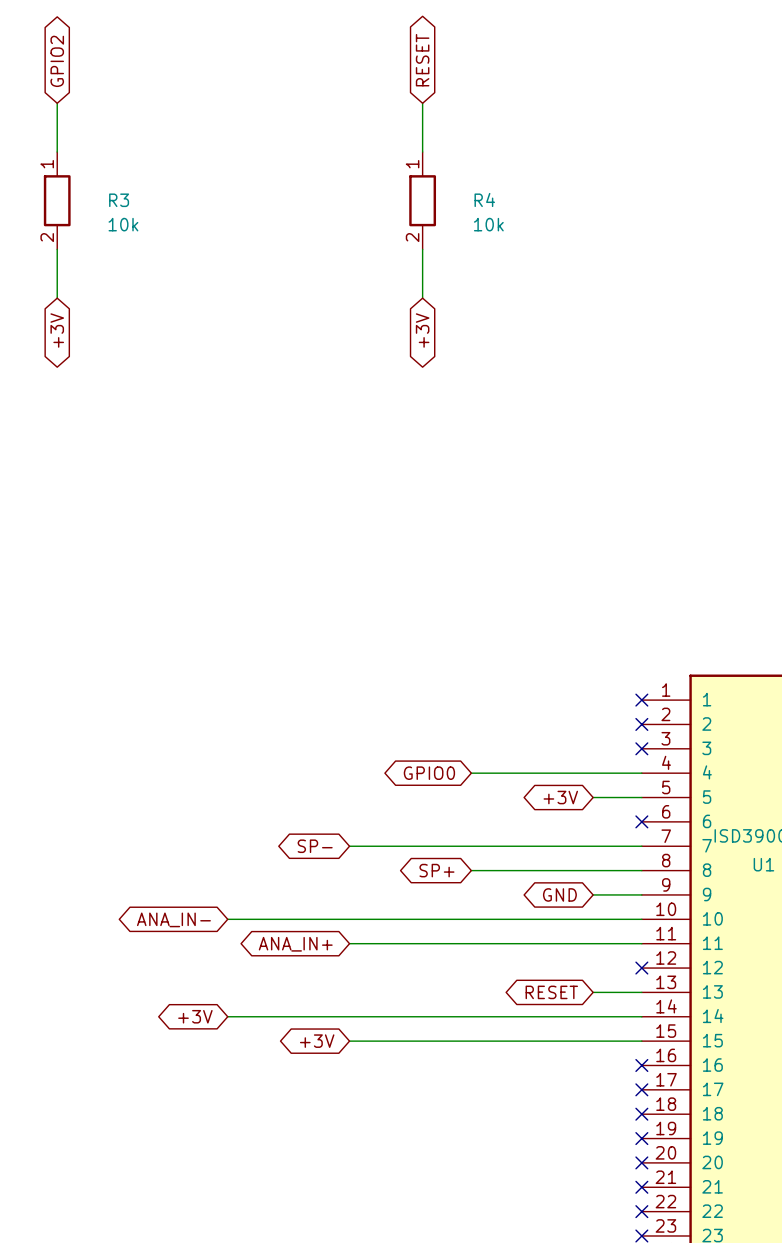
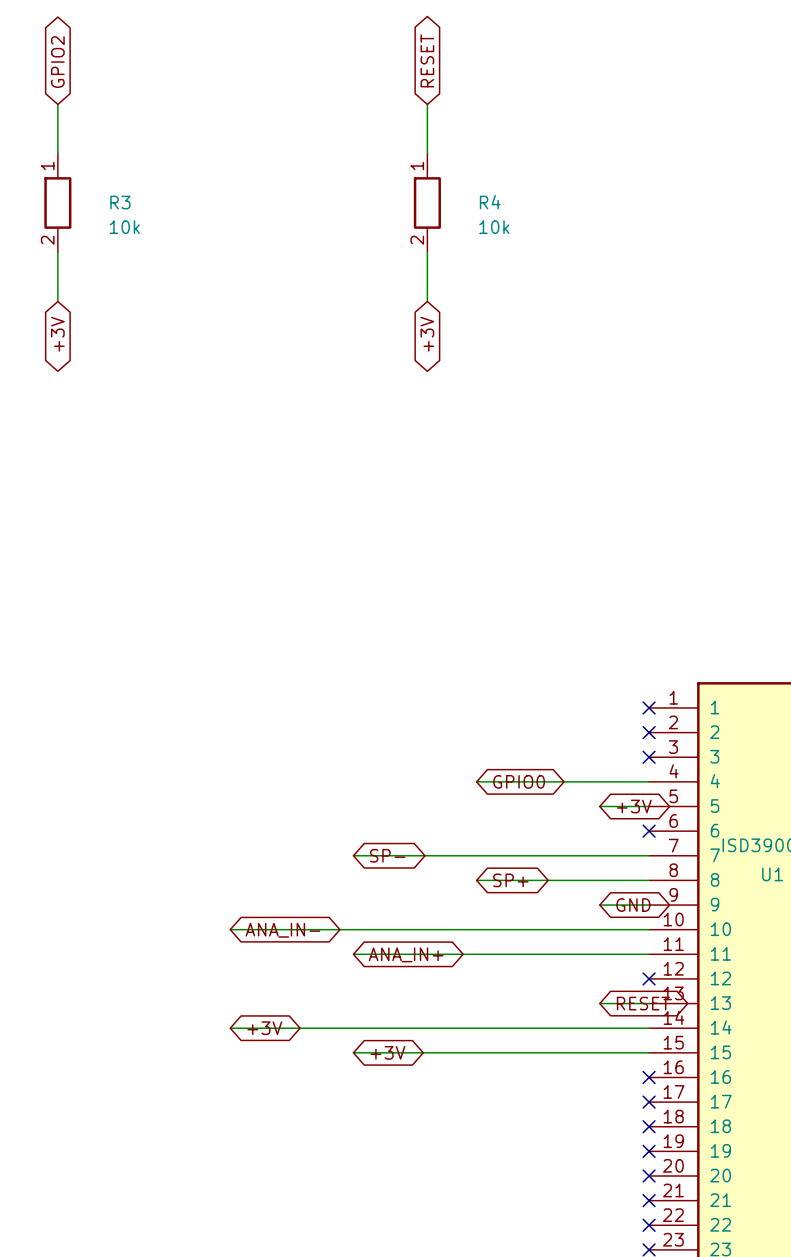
global label rotation: 0° (429, 773) -> 180° (519, 781)
global label rotation: 0° (560, 797) -> 180° (634, 806)
global label rotation: 0° (315, 846) -> 180° (387, 855)
global label rotation: 0° (436, 870) -> 180° (510, 880)
global label rotation: 0° (559, 894) -> 180° (633, 905)
global label rotation: 0° (173, 919) -> 180° (282, 930)
global label position: ANA_IN- (173, 919) -> ANA_IN- (282, 930)
global label rotation: 0° (295, 944) -> 180° (406, 954)
global label position: ANA_IN+ (295, 944) -> ANA_IN+ (406, 954)
global label rotation: 0° (551, 992) -> 180° (643, 1003)
global label rotation: 0° (195, 1016) -> 180° (264, 1028)
global label rotation: 0° (317, 1041) -> 180° (387, 1052)

